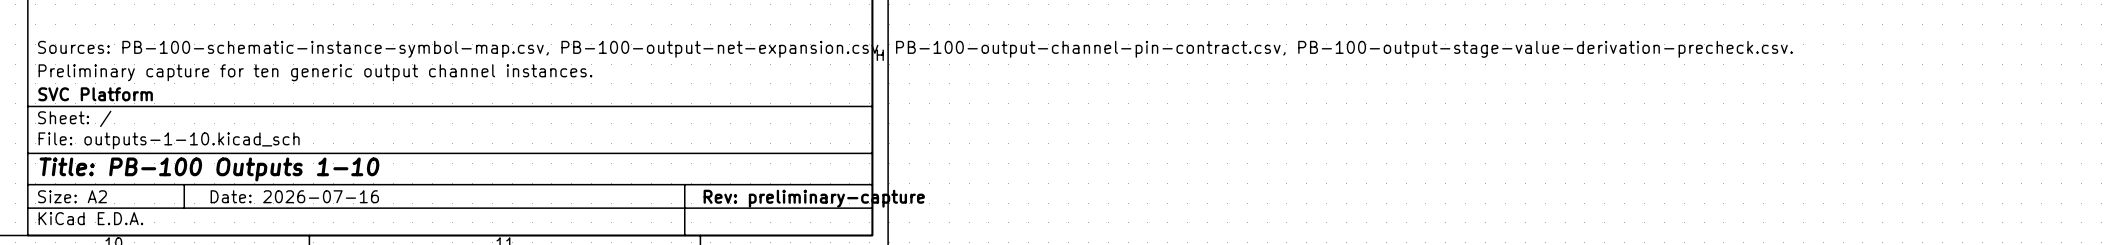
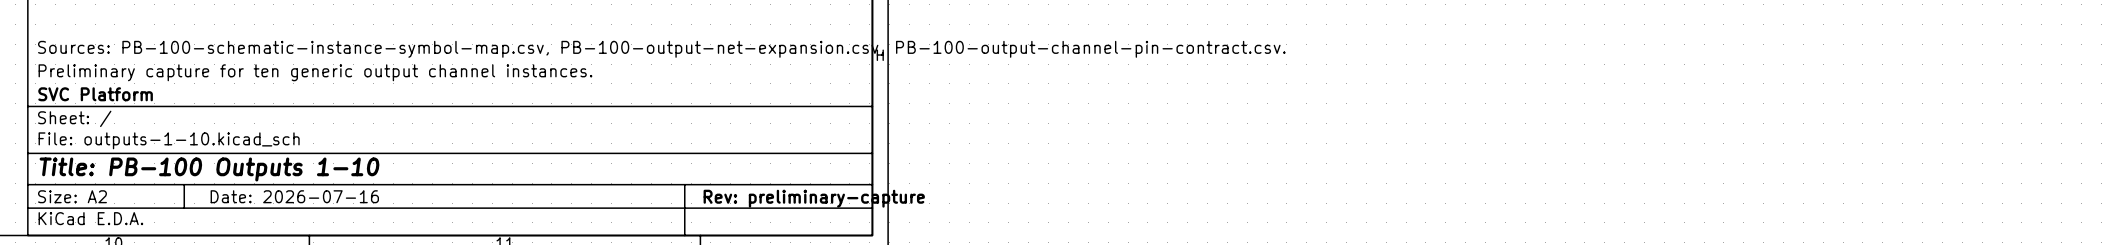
title block: Sources: PB-100-schematic-instance-symbol-map.csv, PB-100-output-net-expansion.csv, PB-100-output-channel-pin-contract.csv, PB-100-output-stage-value-derivation-precheck.csv. (915, 49) -> Sources: PB-100-schematic-instance-symbol-map.csv, PB-100-output-net-expansion.csv, PB-100-output-channel-pin-contract.csv. (661, 49)

